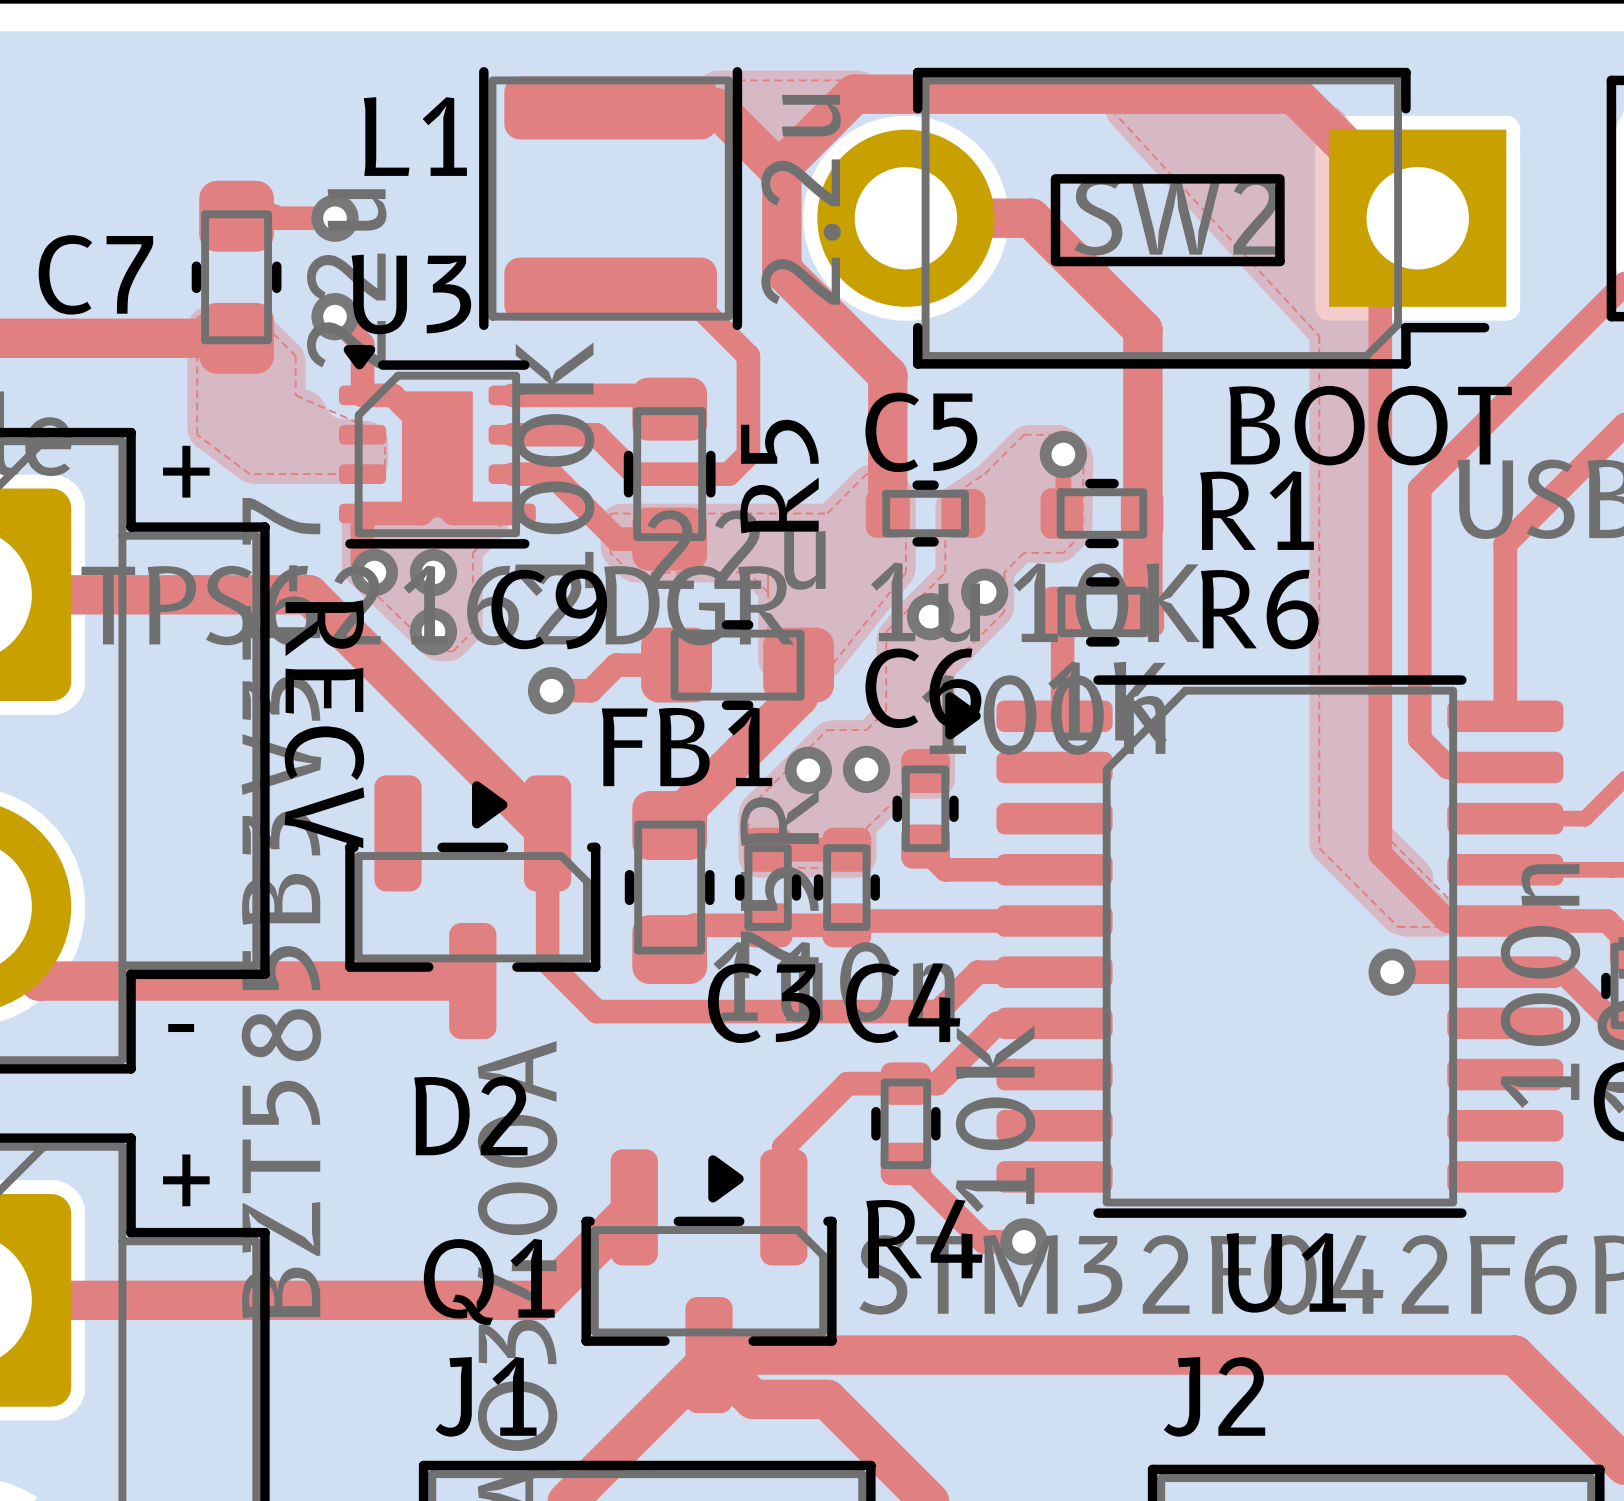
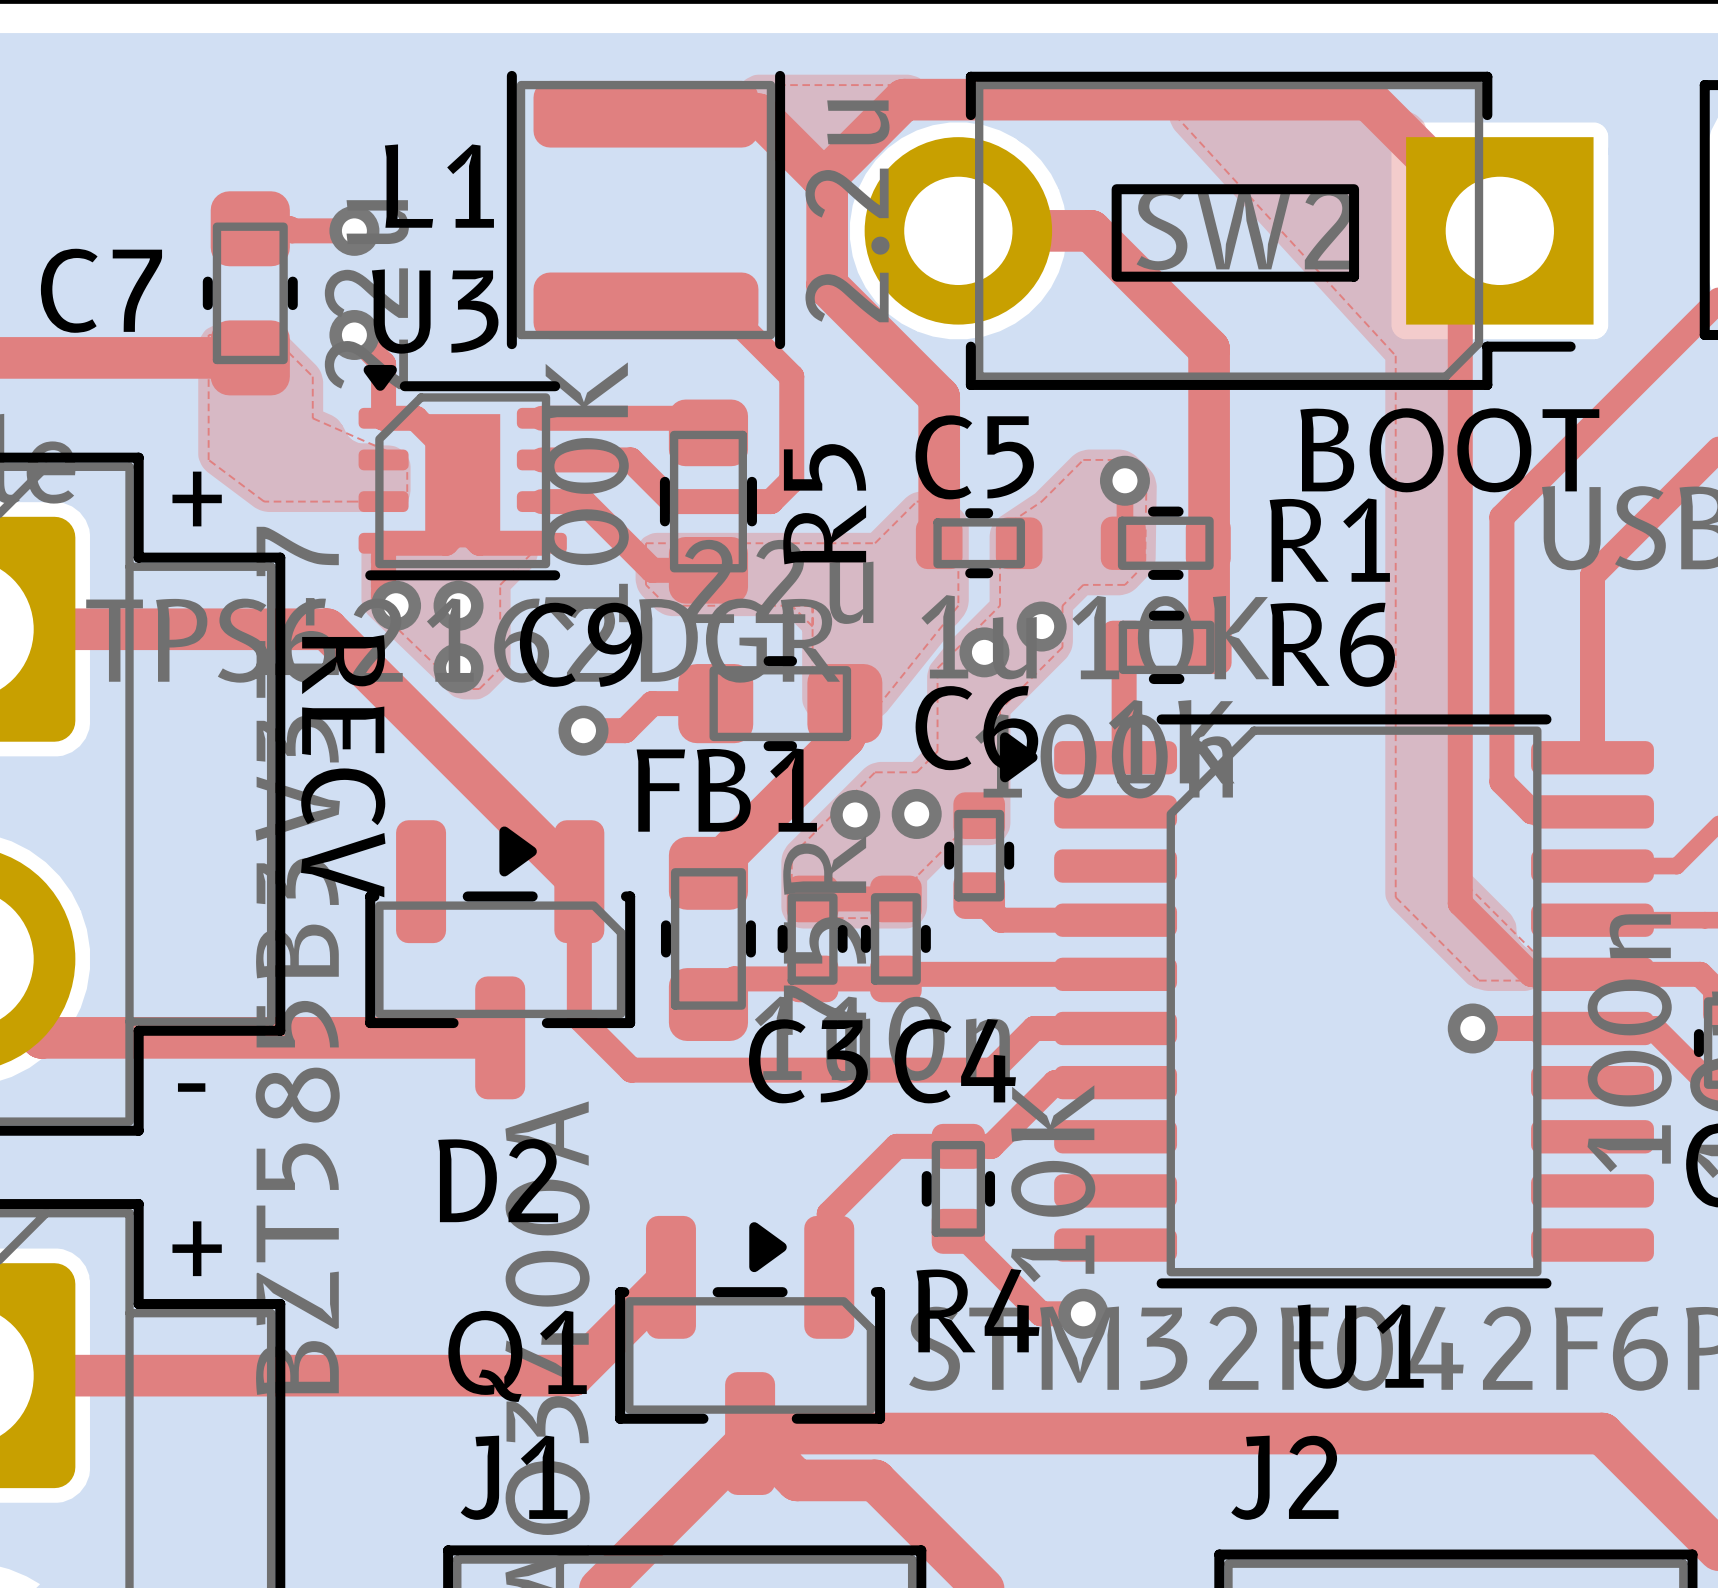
L1 name position: L1 (415, 136) -> L1 (439, 186)

